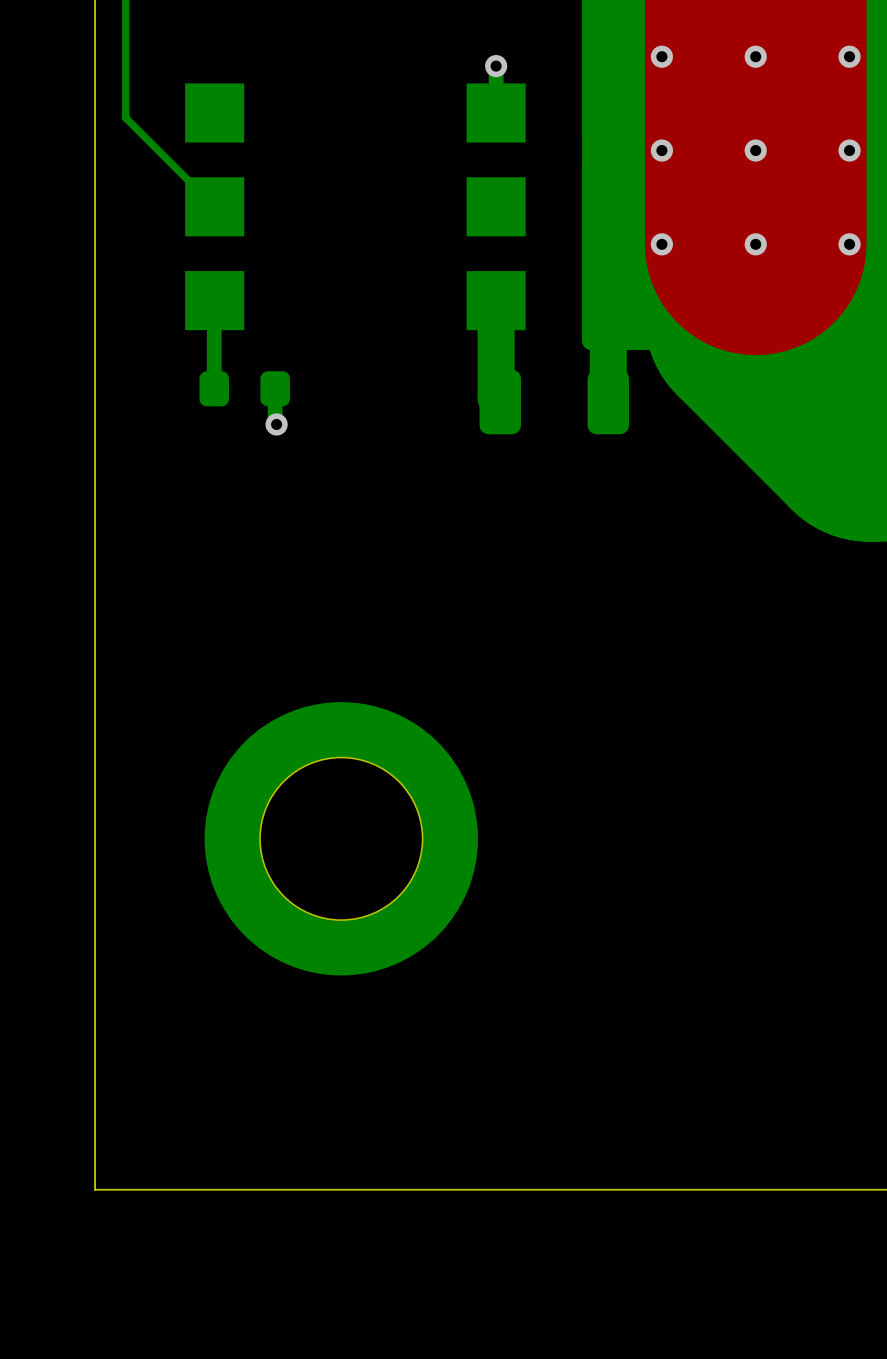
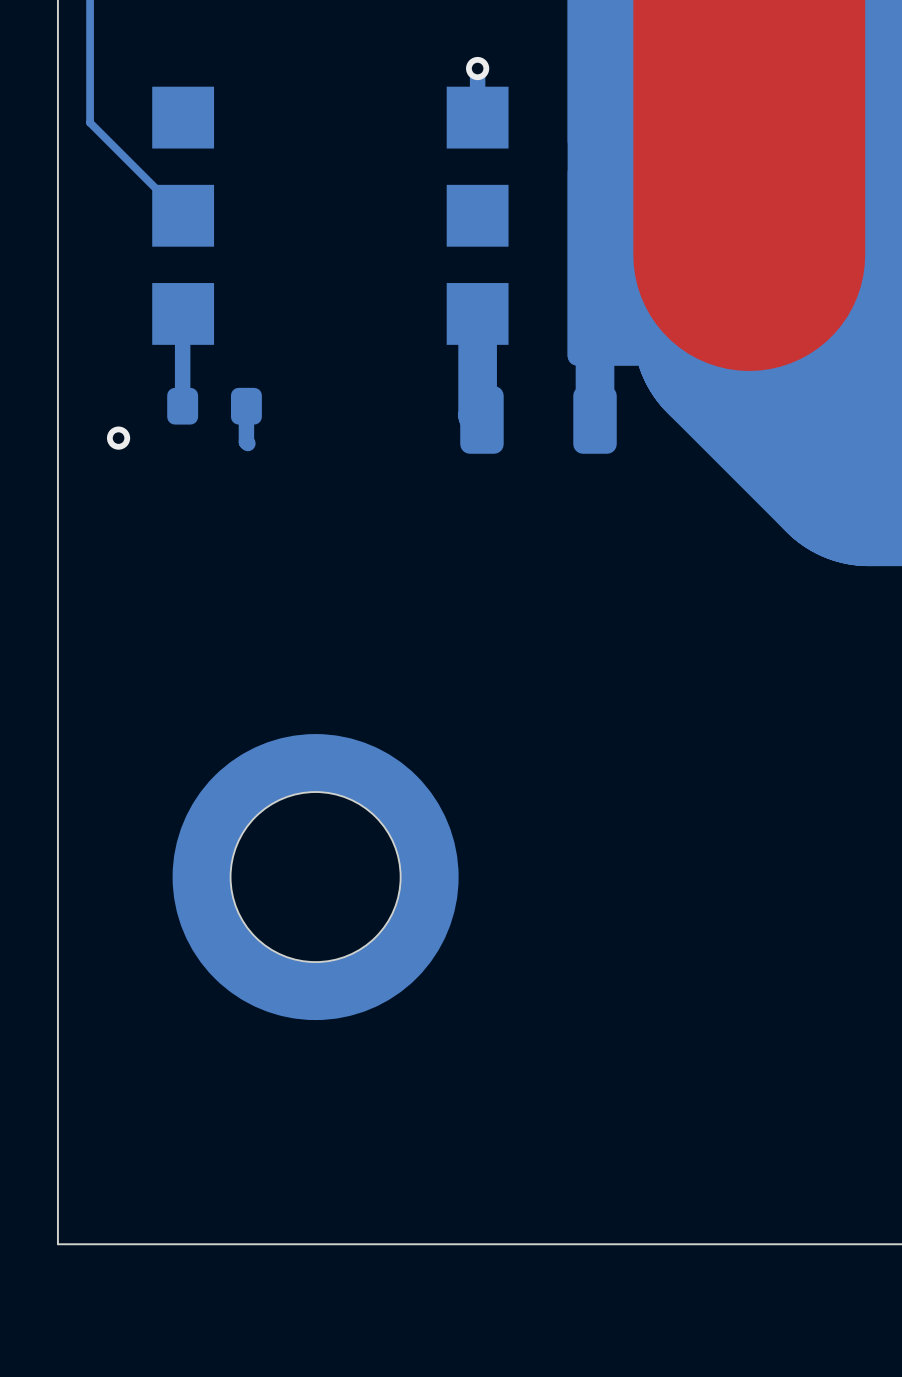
via: (661, 56) -> none
via: (755, 56) -> none
via: (849, 56) -> none
via: (661, 150) -> none
via: (755, 150) -> none
via: (849, 150) -> none
via: (661, 244) -> none
via: (755, 244) -> none
via: (849, 244) -> none
via position: (276, 424) -> (118, 438)

